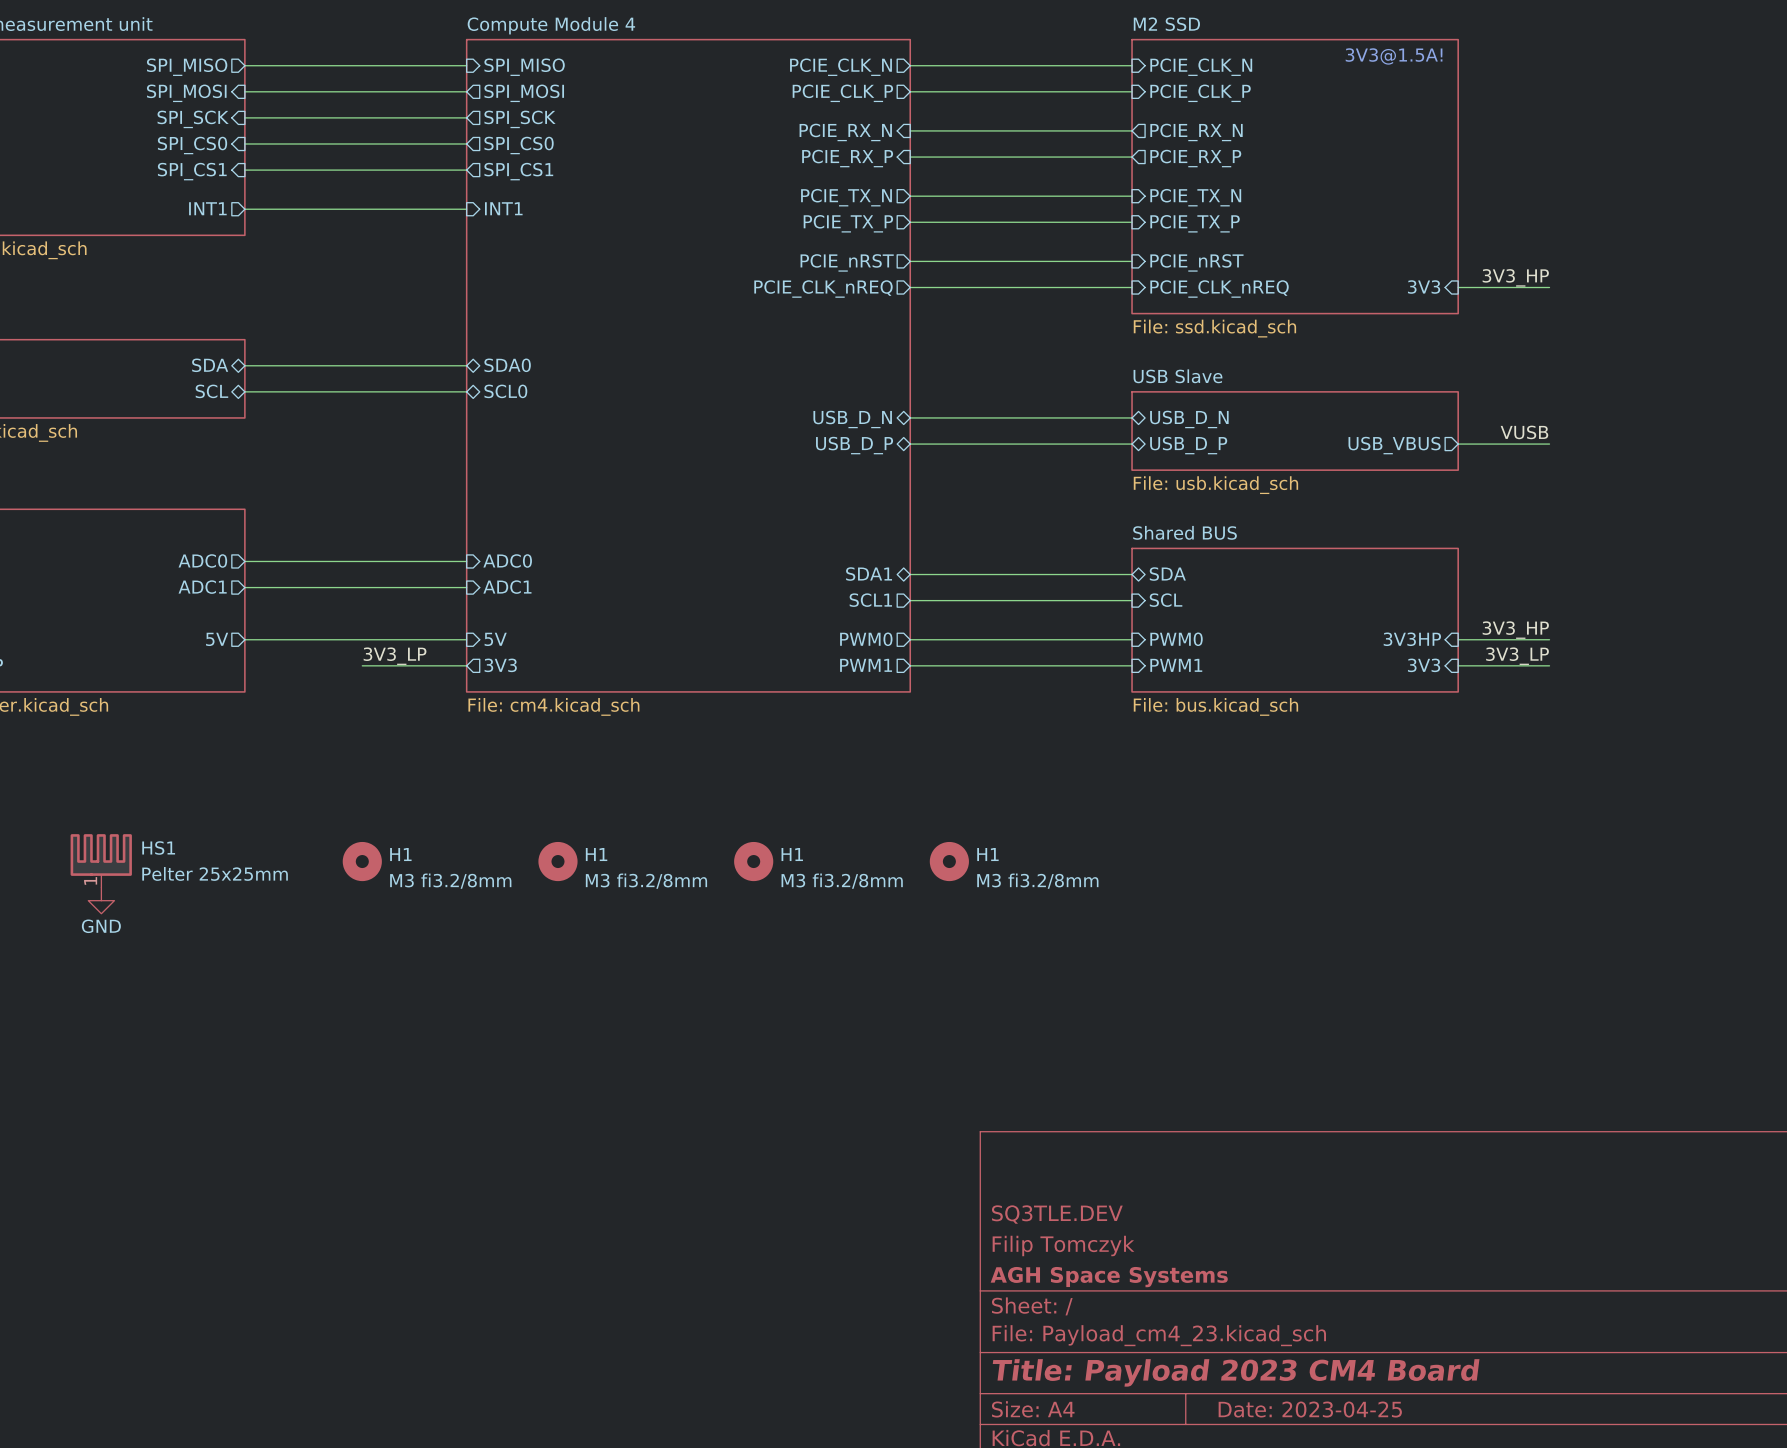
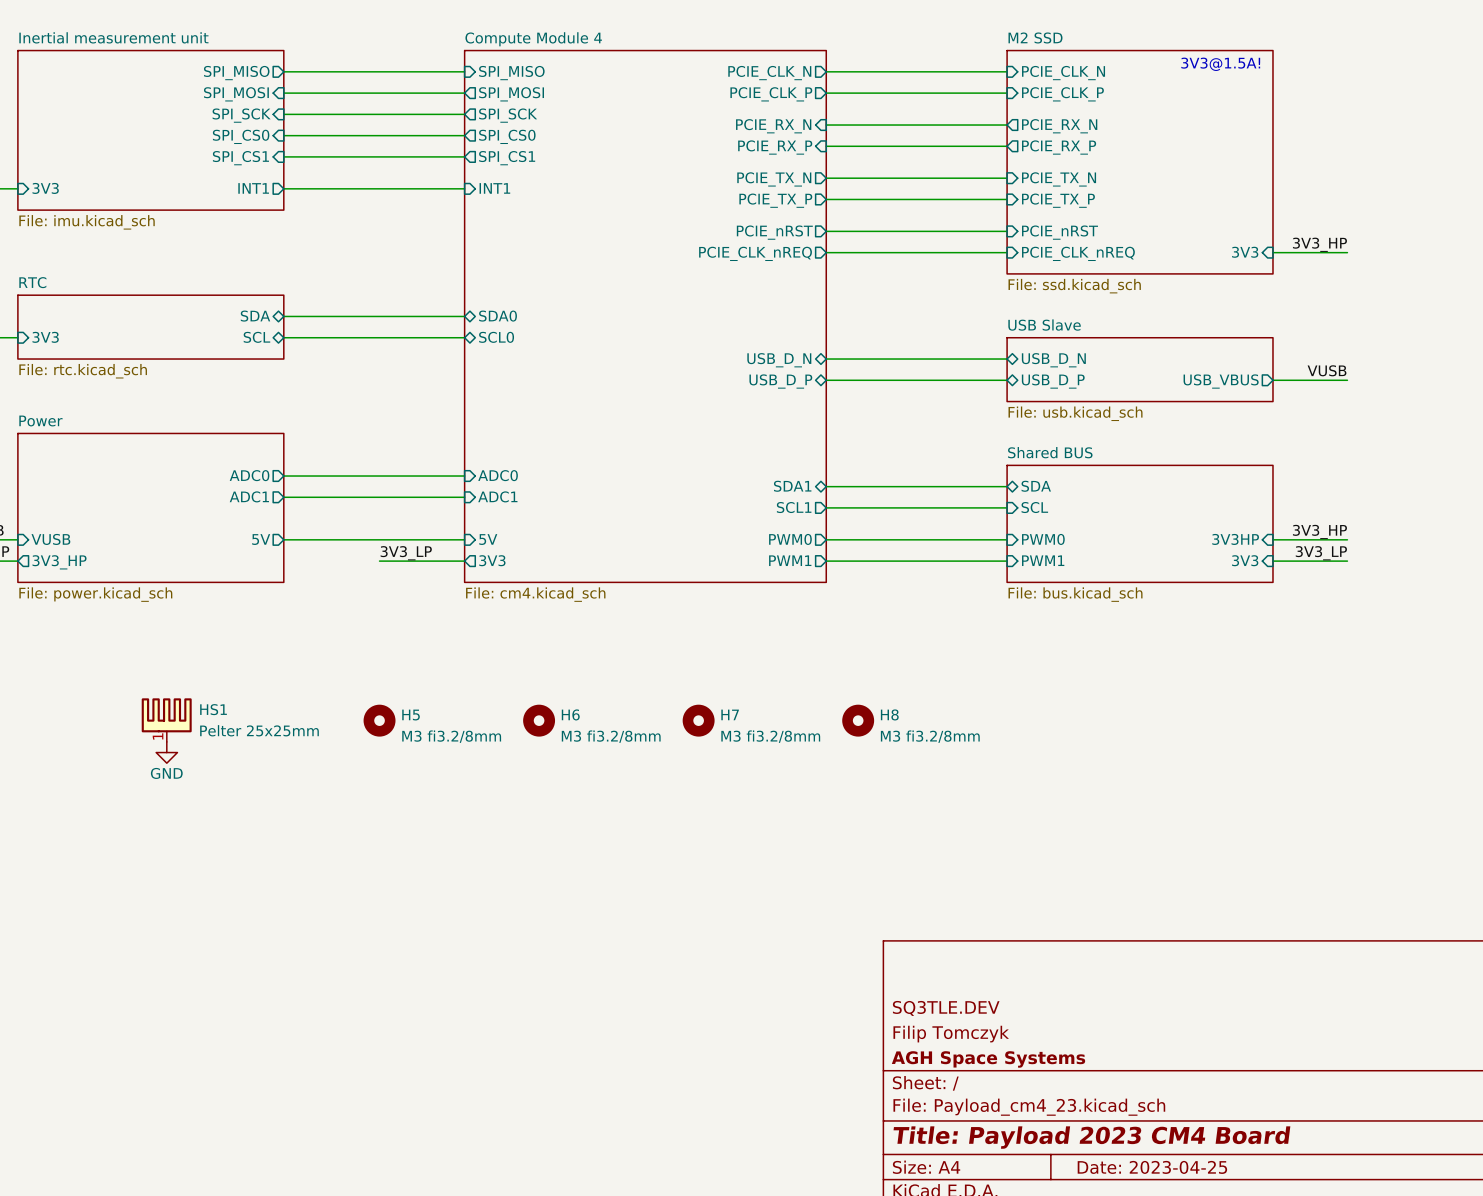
H1 name: H1 (400, 854) -> H5 (411, 715)
H1 name: H1 (596, 854) -> H6 (570, 714)
H1 name: H1 (792, 854) -> H7 (730, 714)
H1 name: H1 (987, 854) -> H8 (889, 714)

